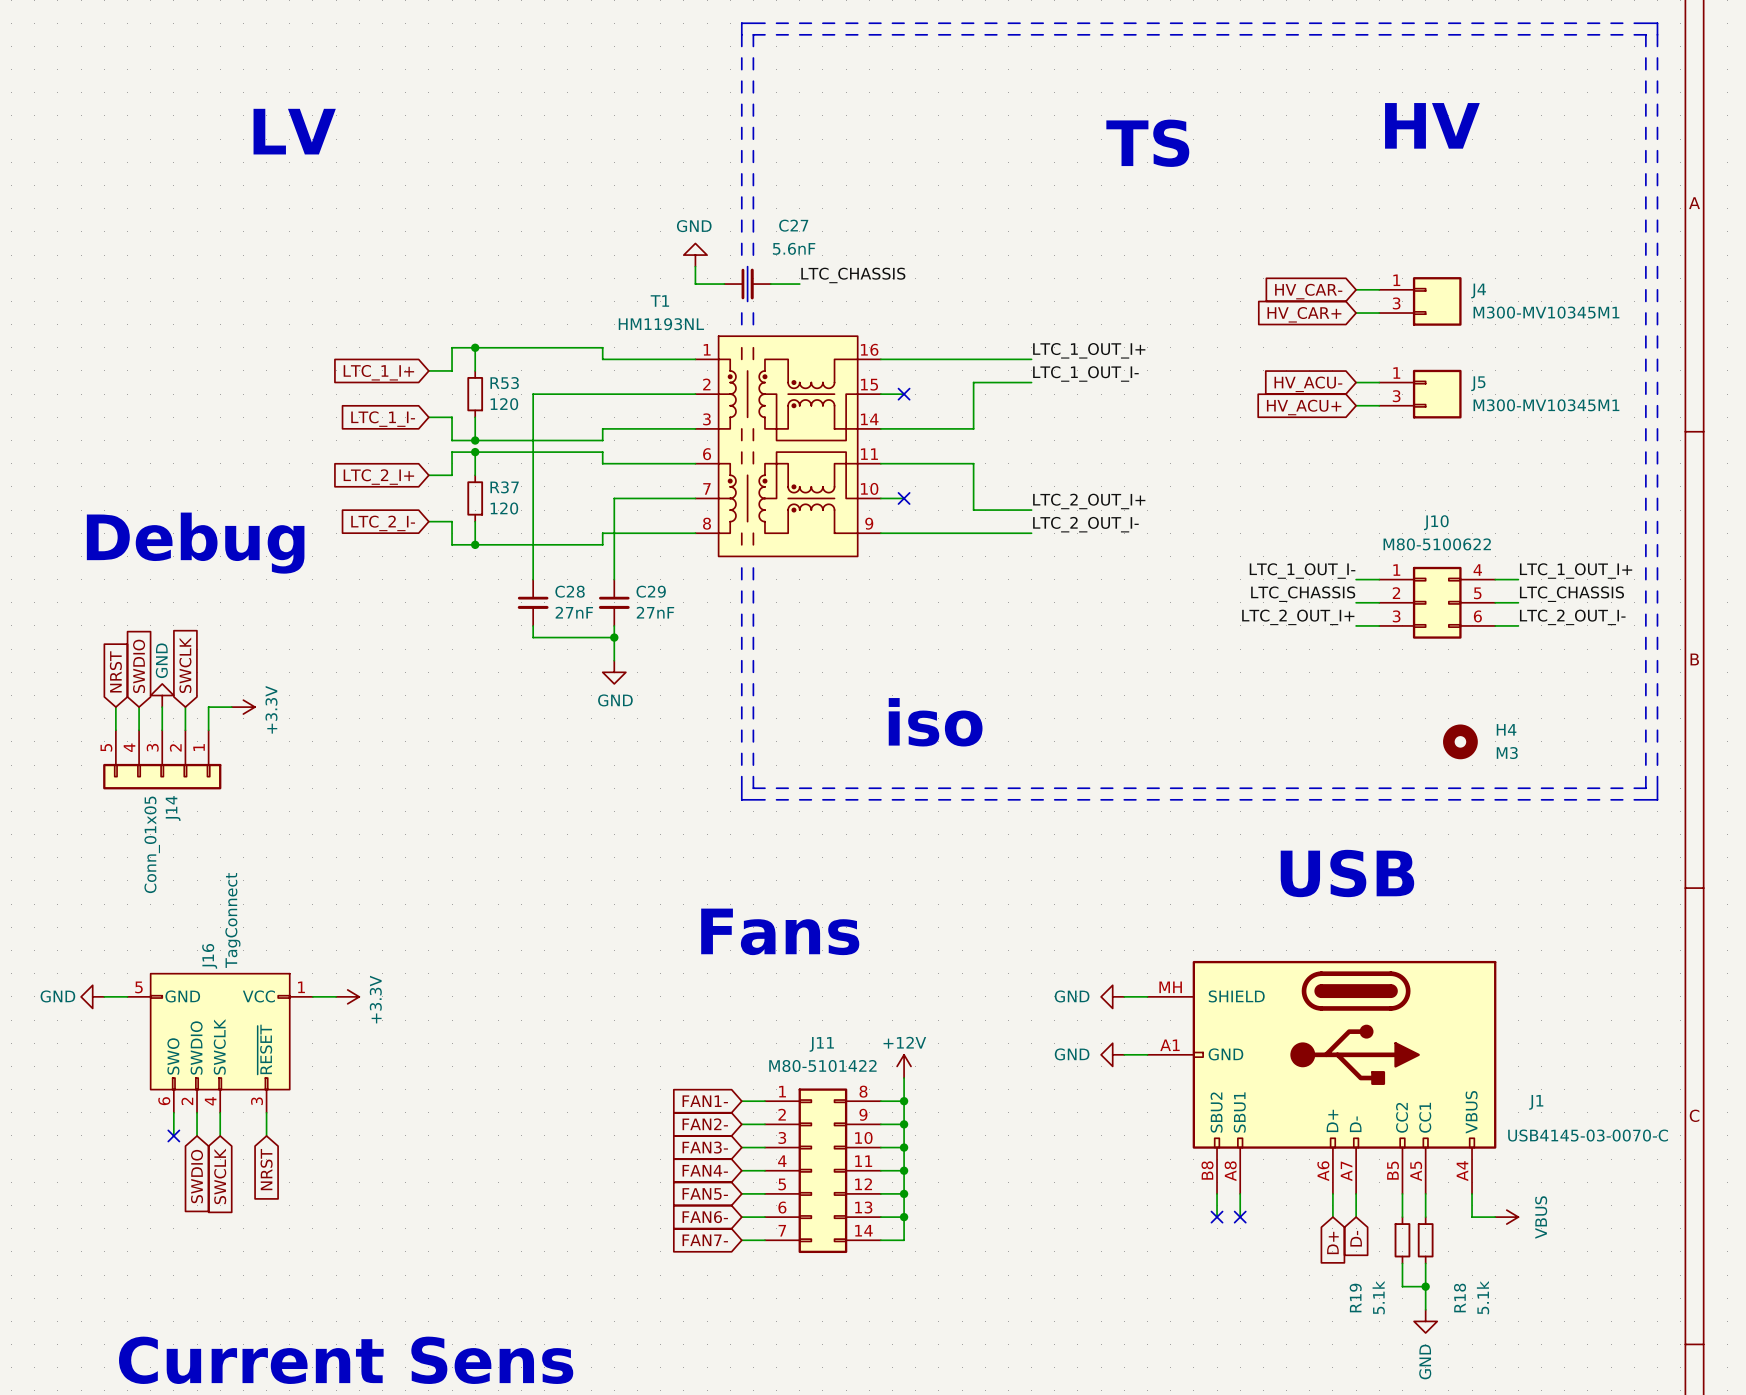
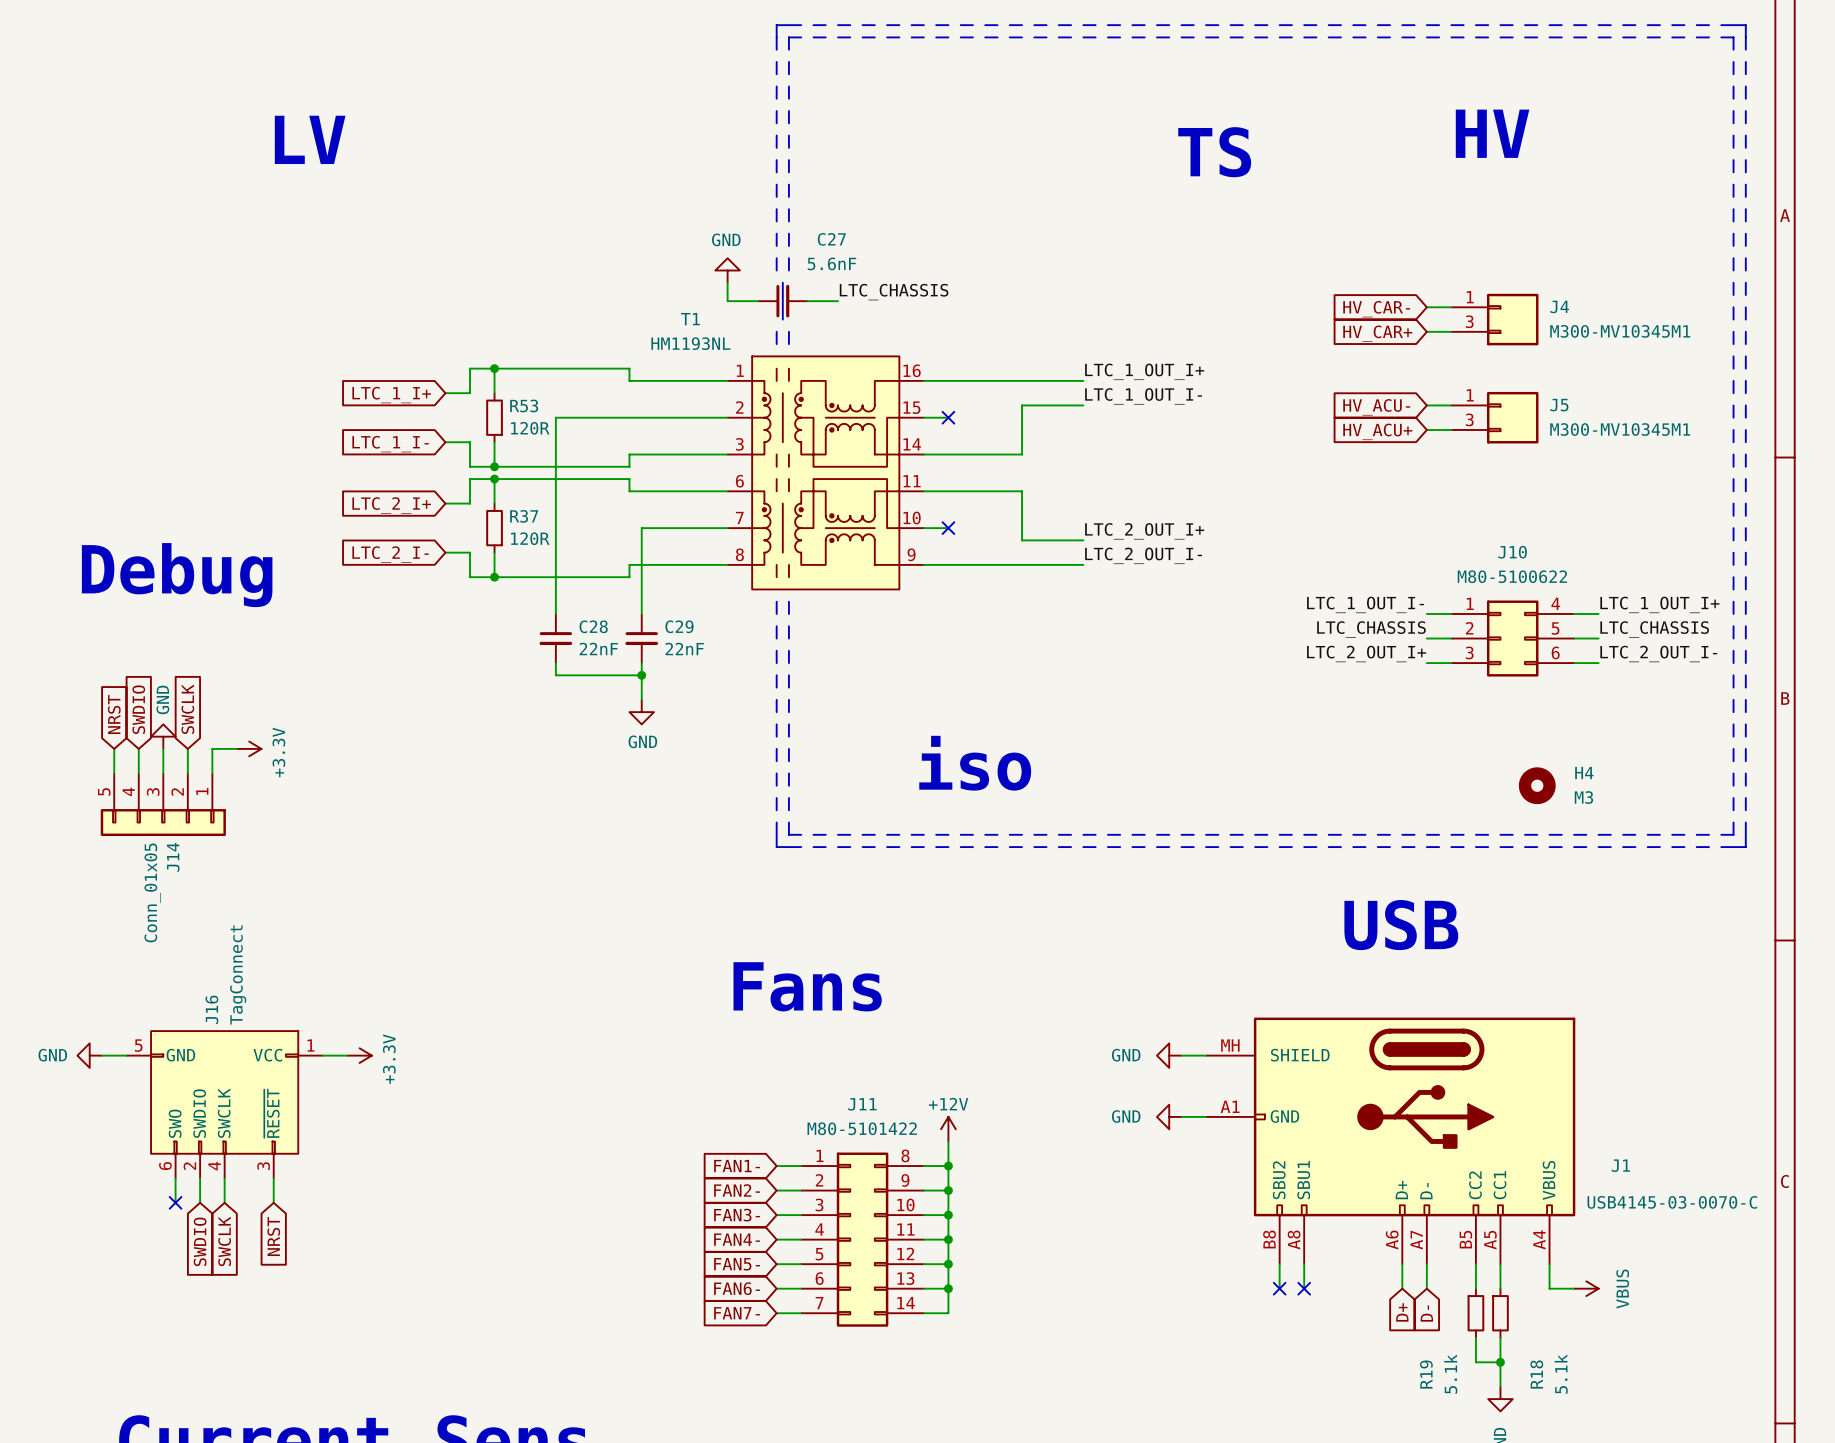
R53 value: 120 (504, 404) -> 120R (530, 428)
R37 value: 120 (504, 508) -> 120R (530, 538)
C28 value: 27nF (574, 612) -> 22nF (598, 649)
C29 value: 27nF (655, 612) -> 22nF (684, 649)

